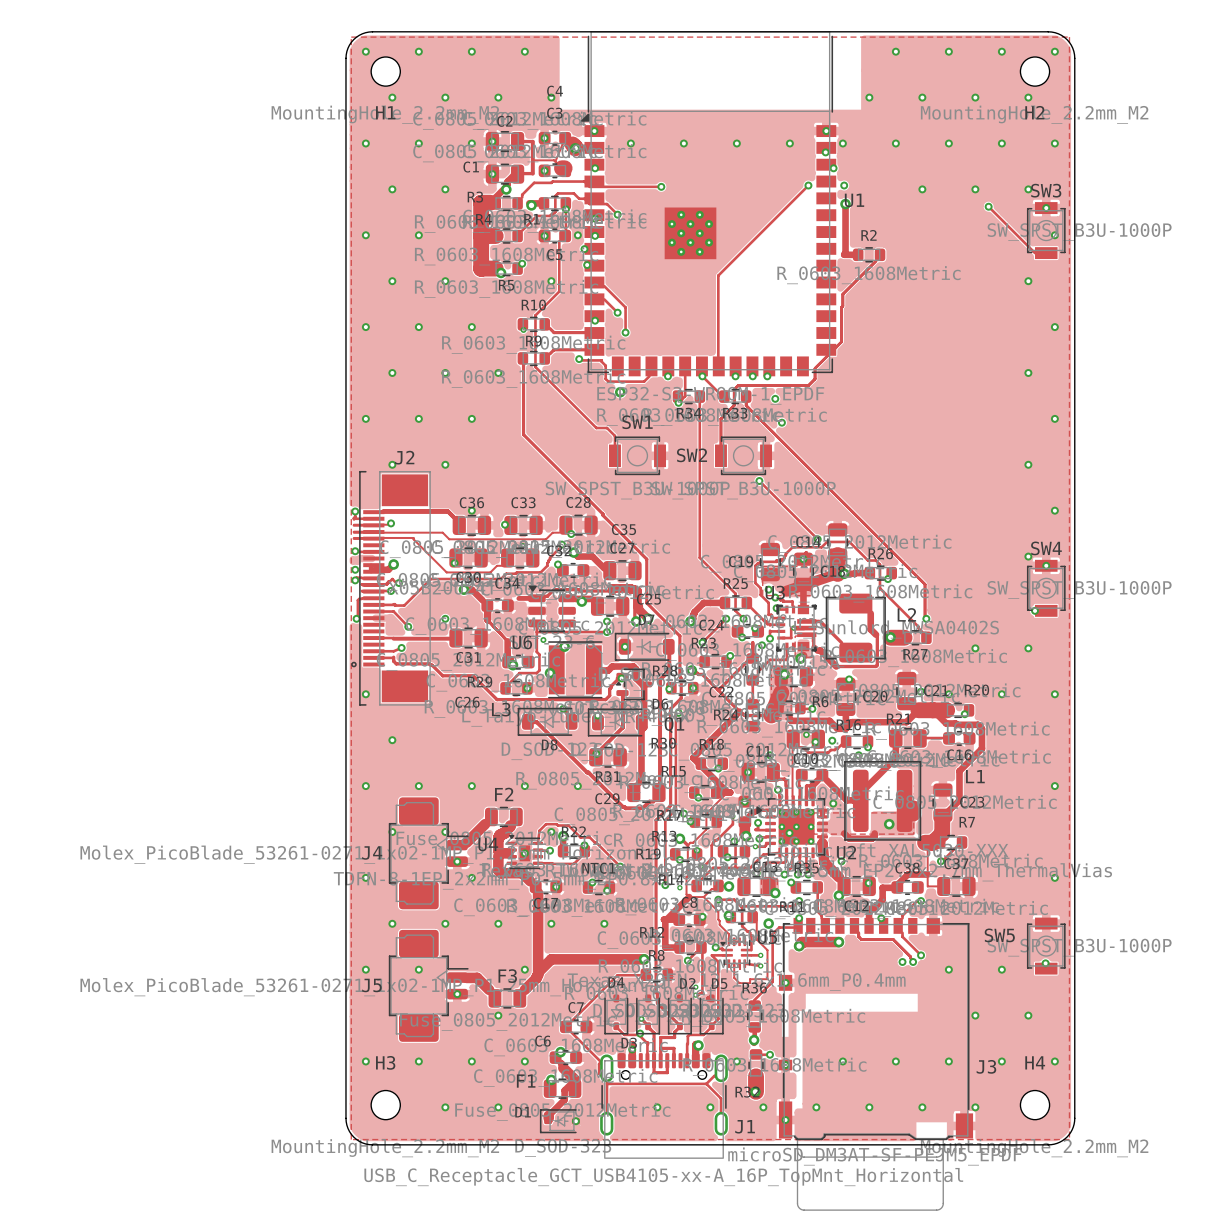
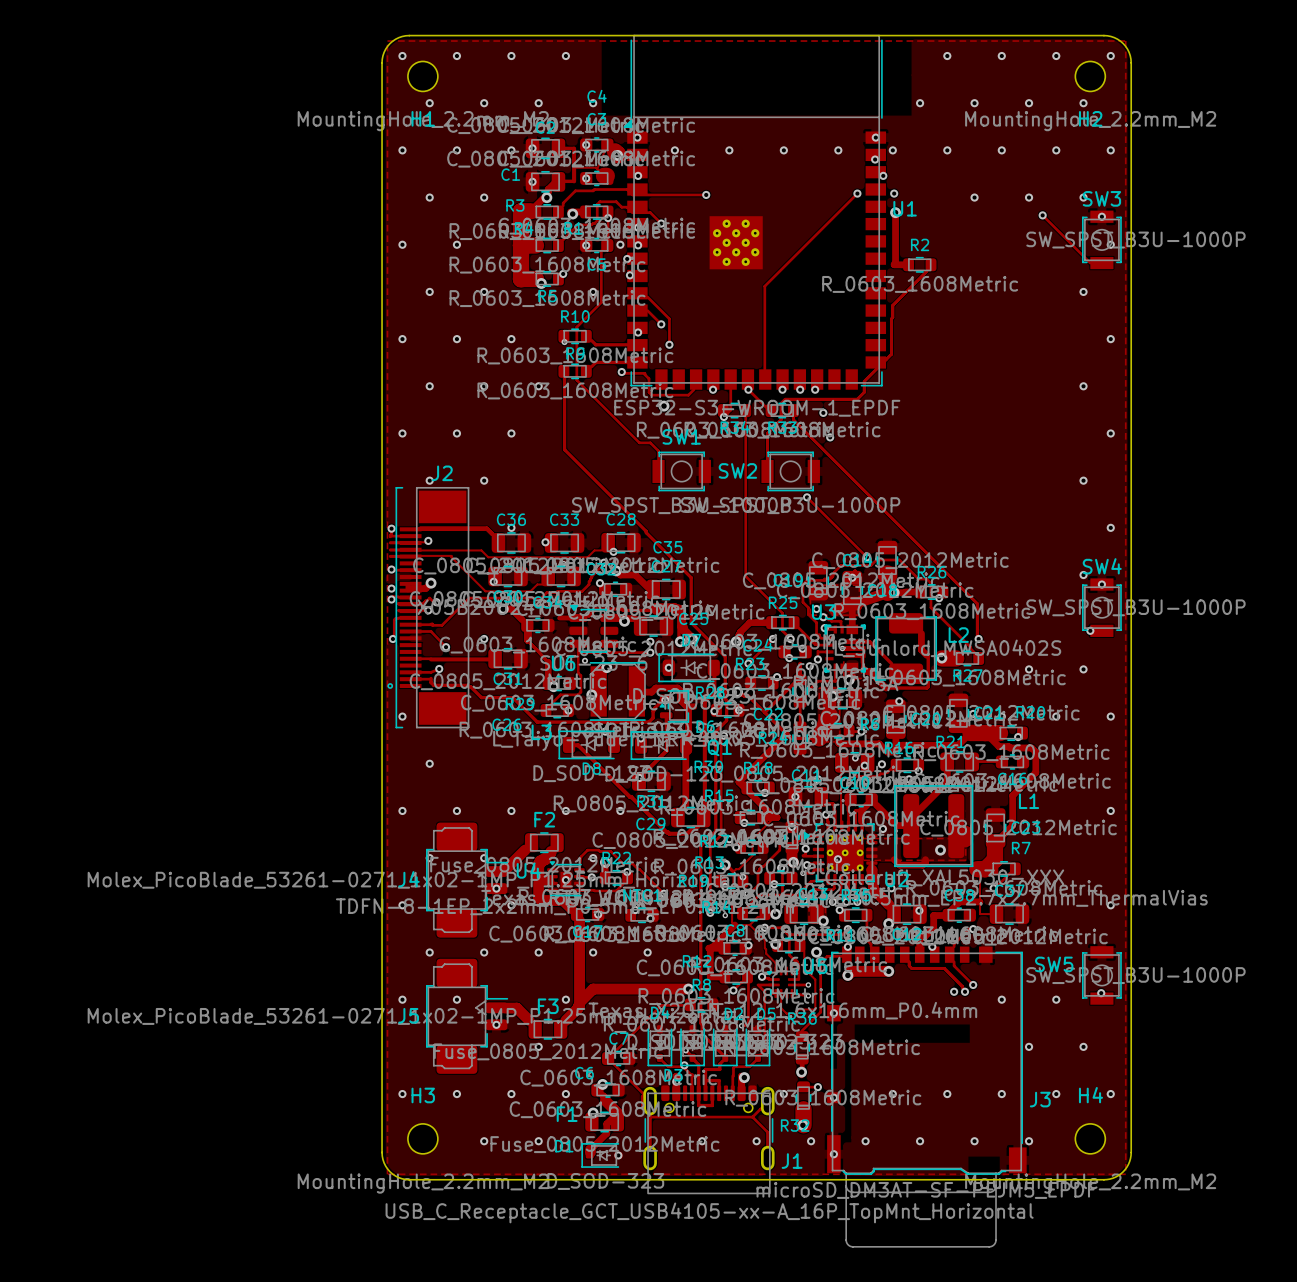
track: (793, 628) (791, 628) (791, 638) (782, 638) -> none

